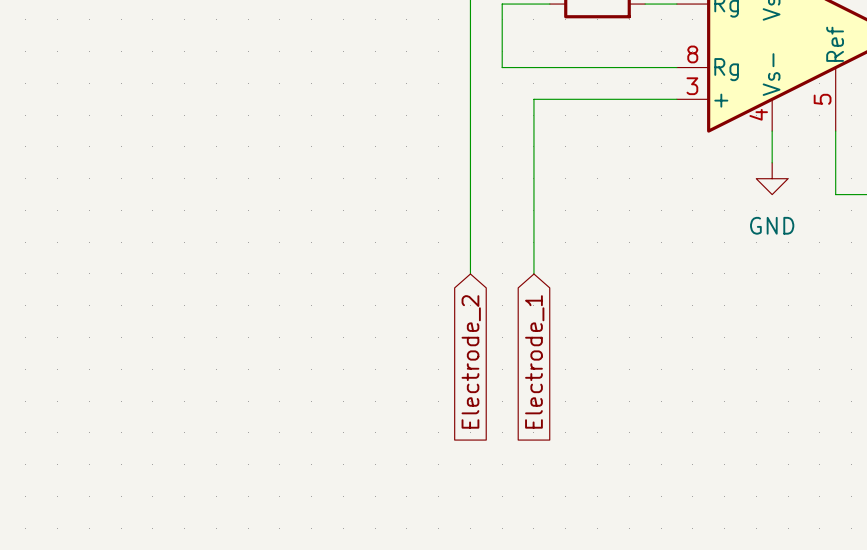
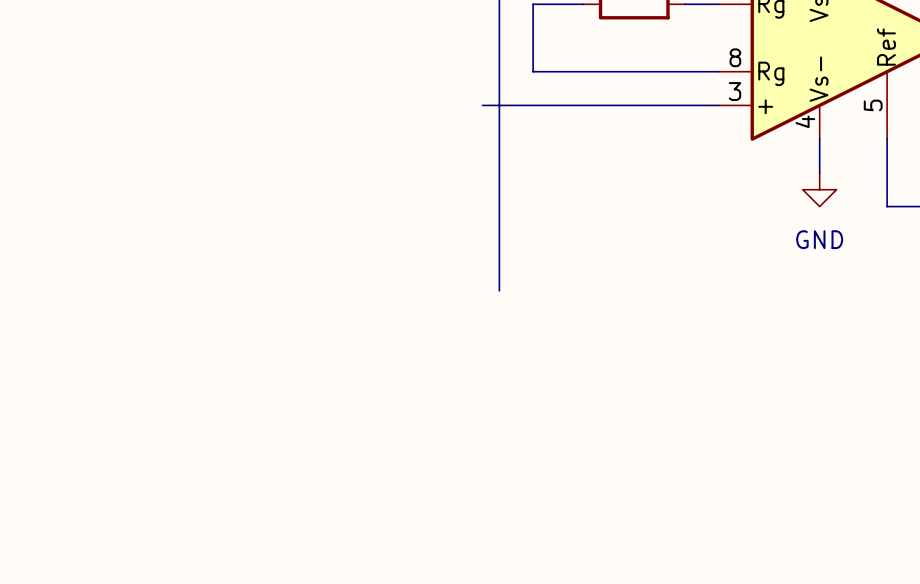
wire: (533, 99) (533, 273) -> (566, 105) (482, 105)
global label: Electrode_2 (471, 361) -> none
global label: Electrode_1 (534, 361) -> none

